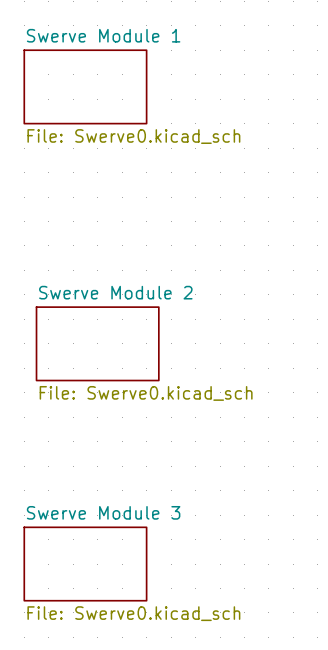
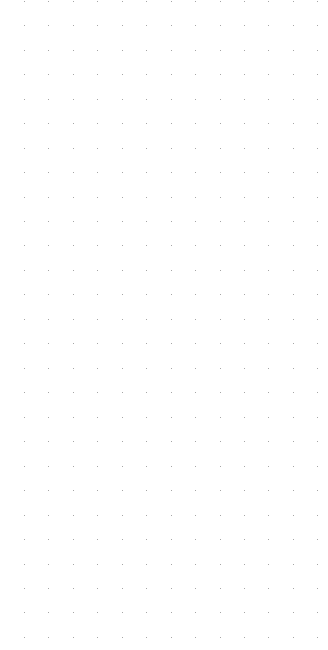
sheet Swerve Module 1: File: Swerve0.kicad_sch (85, 86) -> none
sheet Swerve Module 2: File: Swerve0.kicad_sch (97, 343) -> none
sheet Swerve Module 3: File: Swerve0.kicad_sch (85, 564) -> none

